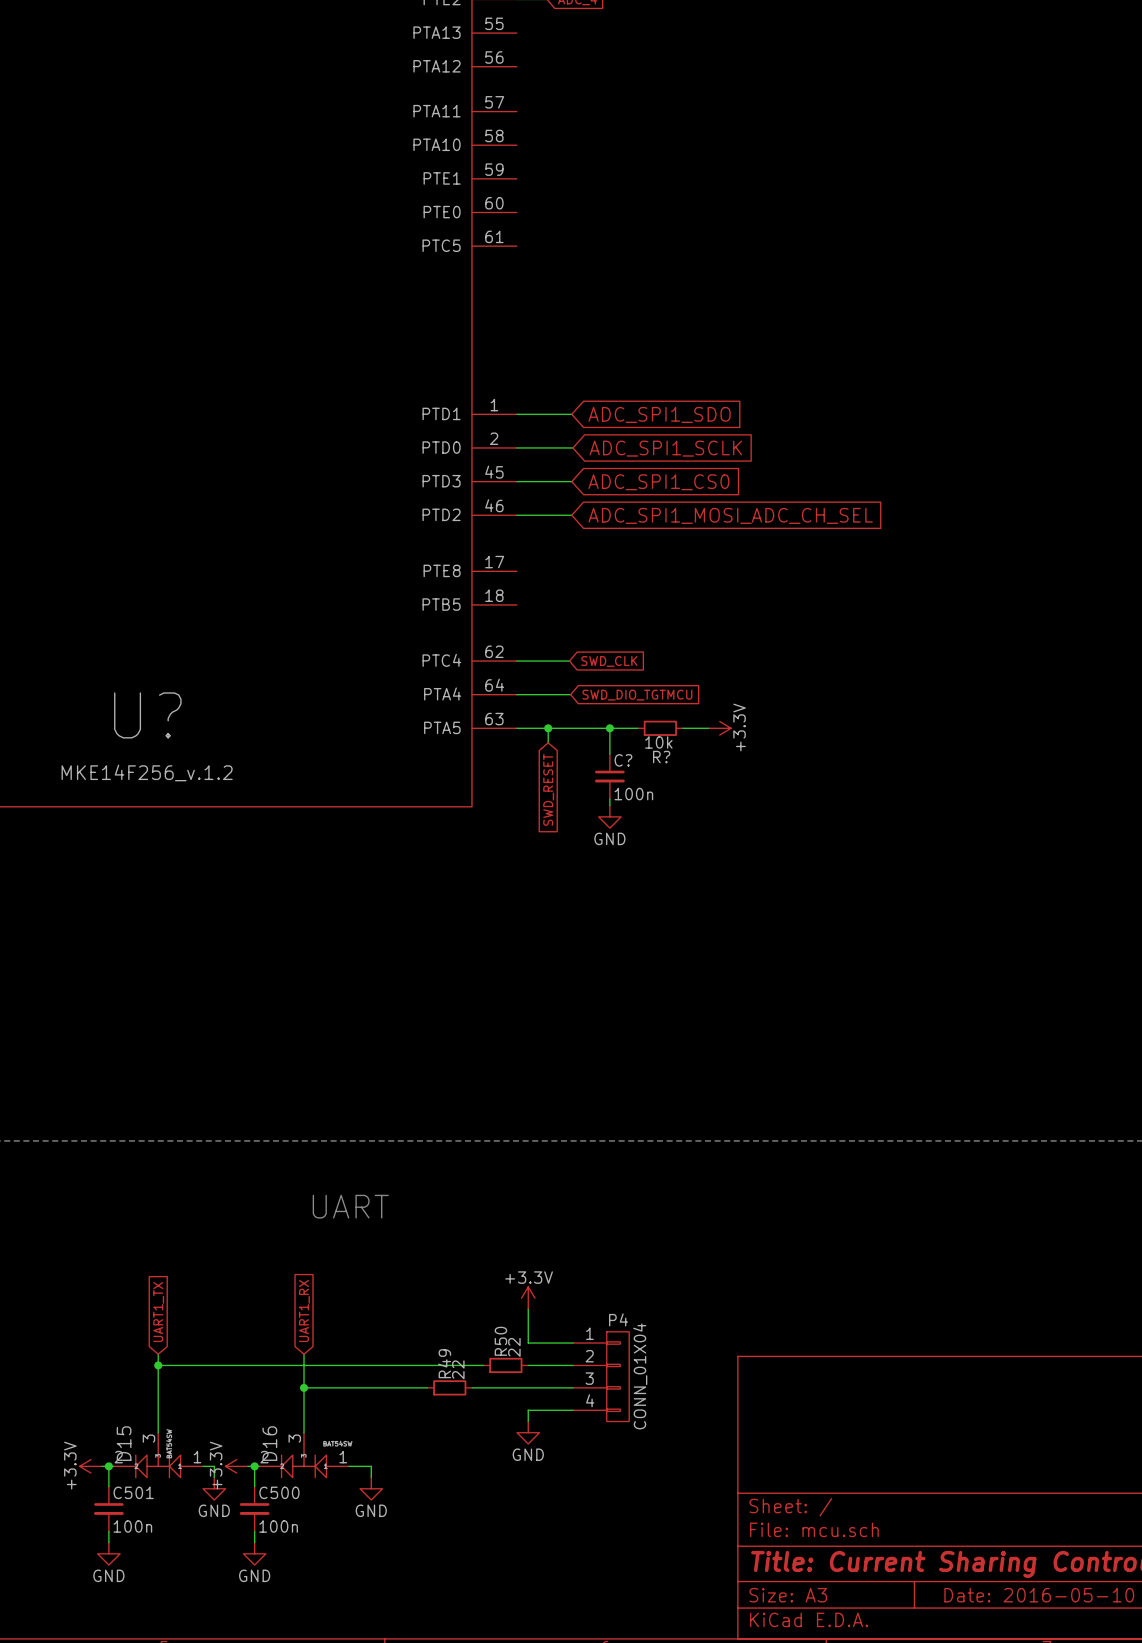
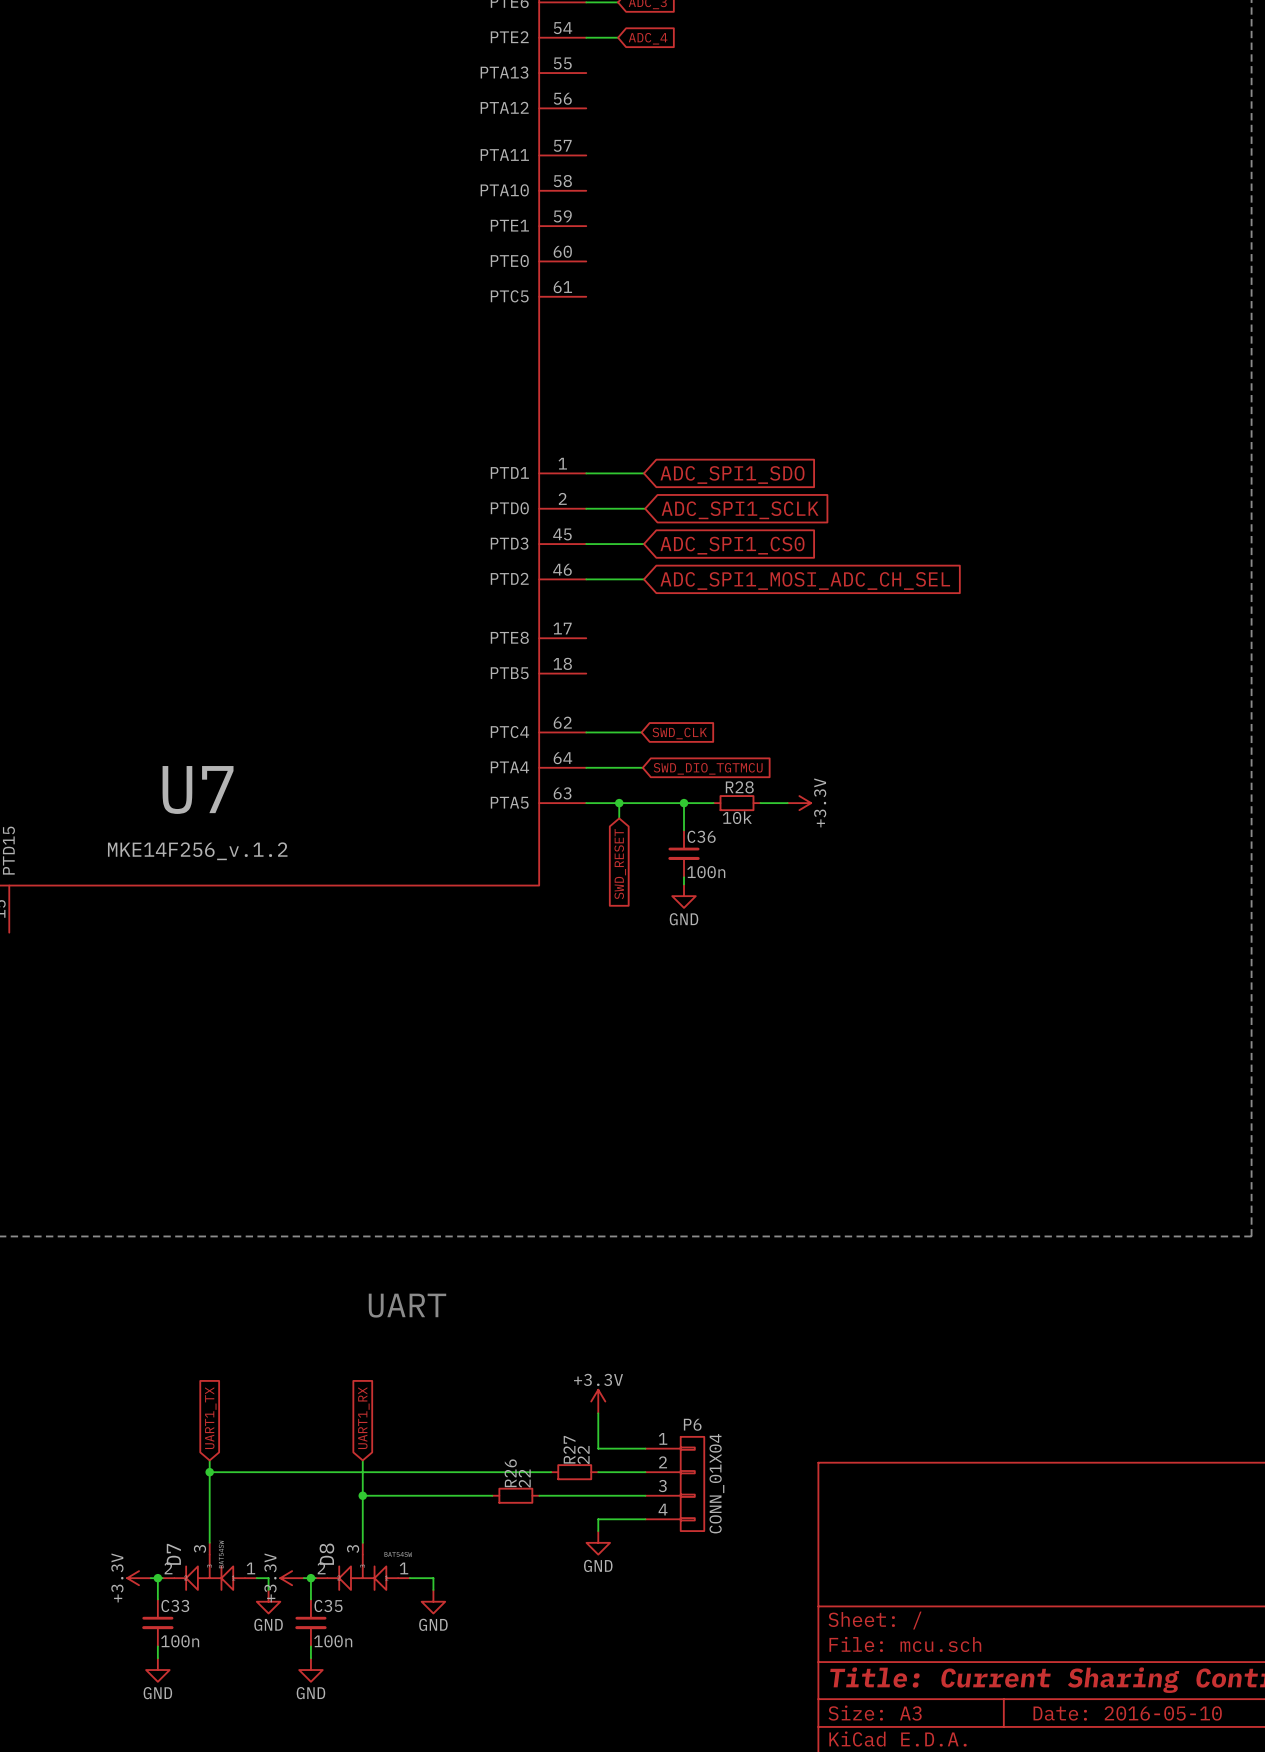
U? name: U? (147, 715) -> U7 (198, 789)
R? name: R? (661, 757) -> R28 (739, 787)
C? name: C? (623, 760) -> C36 (701, 836)
P4 name: P4 (618, 1319) -> P6 (692, 1424)
R50 name: R50 (500, 1341) -> R27 (569, 1449)
R49 name: R49 (444, 1363) -> R26 (510, 1473)
D15 name: D15 (124, 1443) -> D7 (173, 1554)
D16 name: D16 (269, 1443) -> D8 (326, 1554)
C501 name: C501 (133, 1492) -> C33 (175, 1605)
C500 name: C500 (279, 1492) -> C35 (328, 1605)

